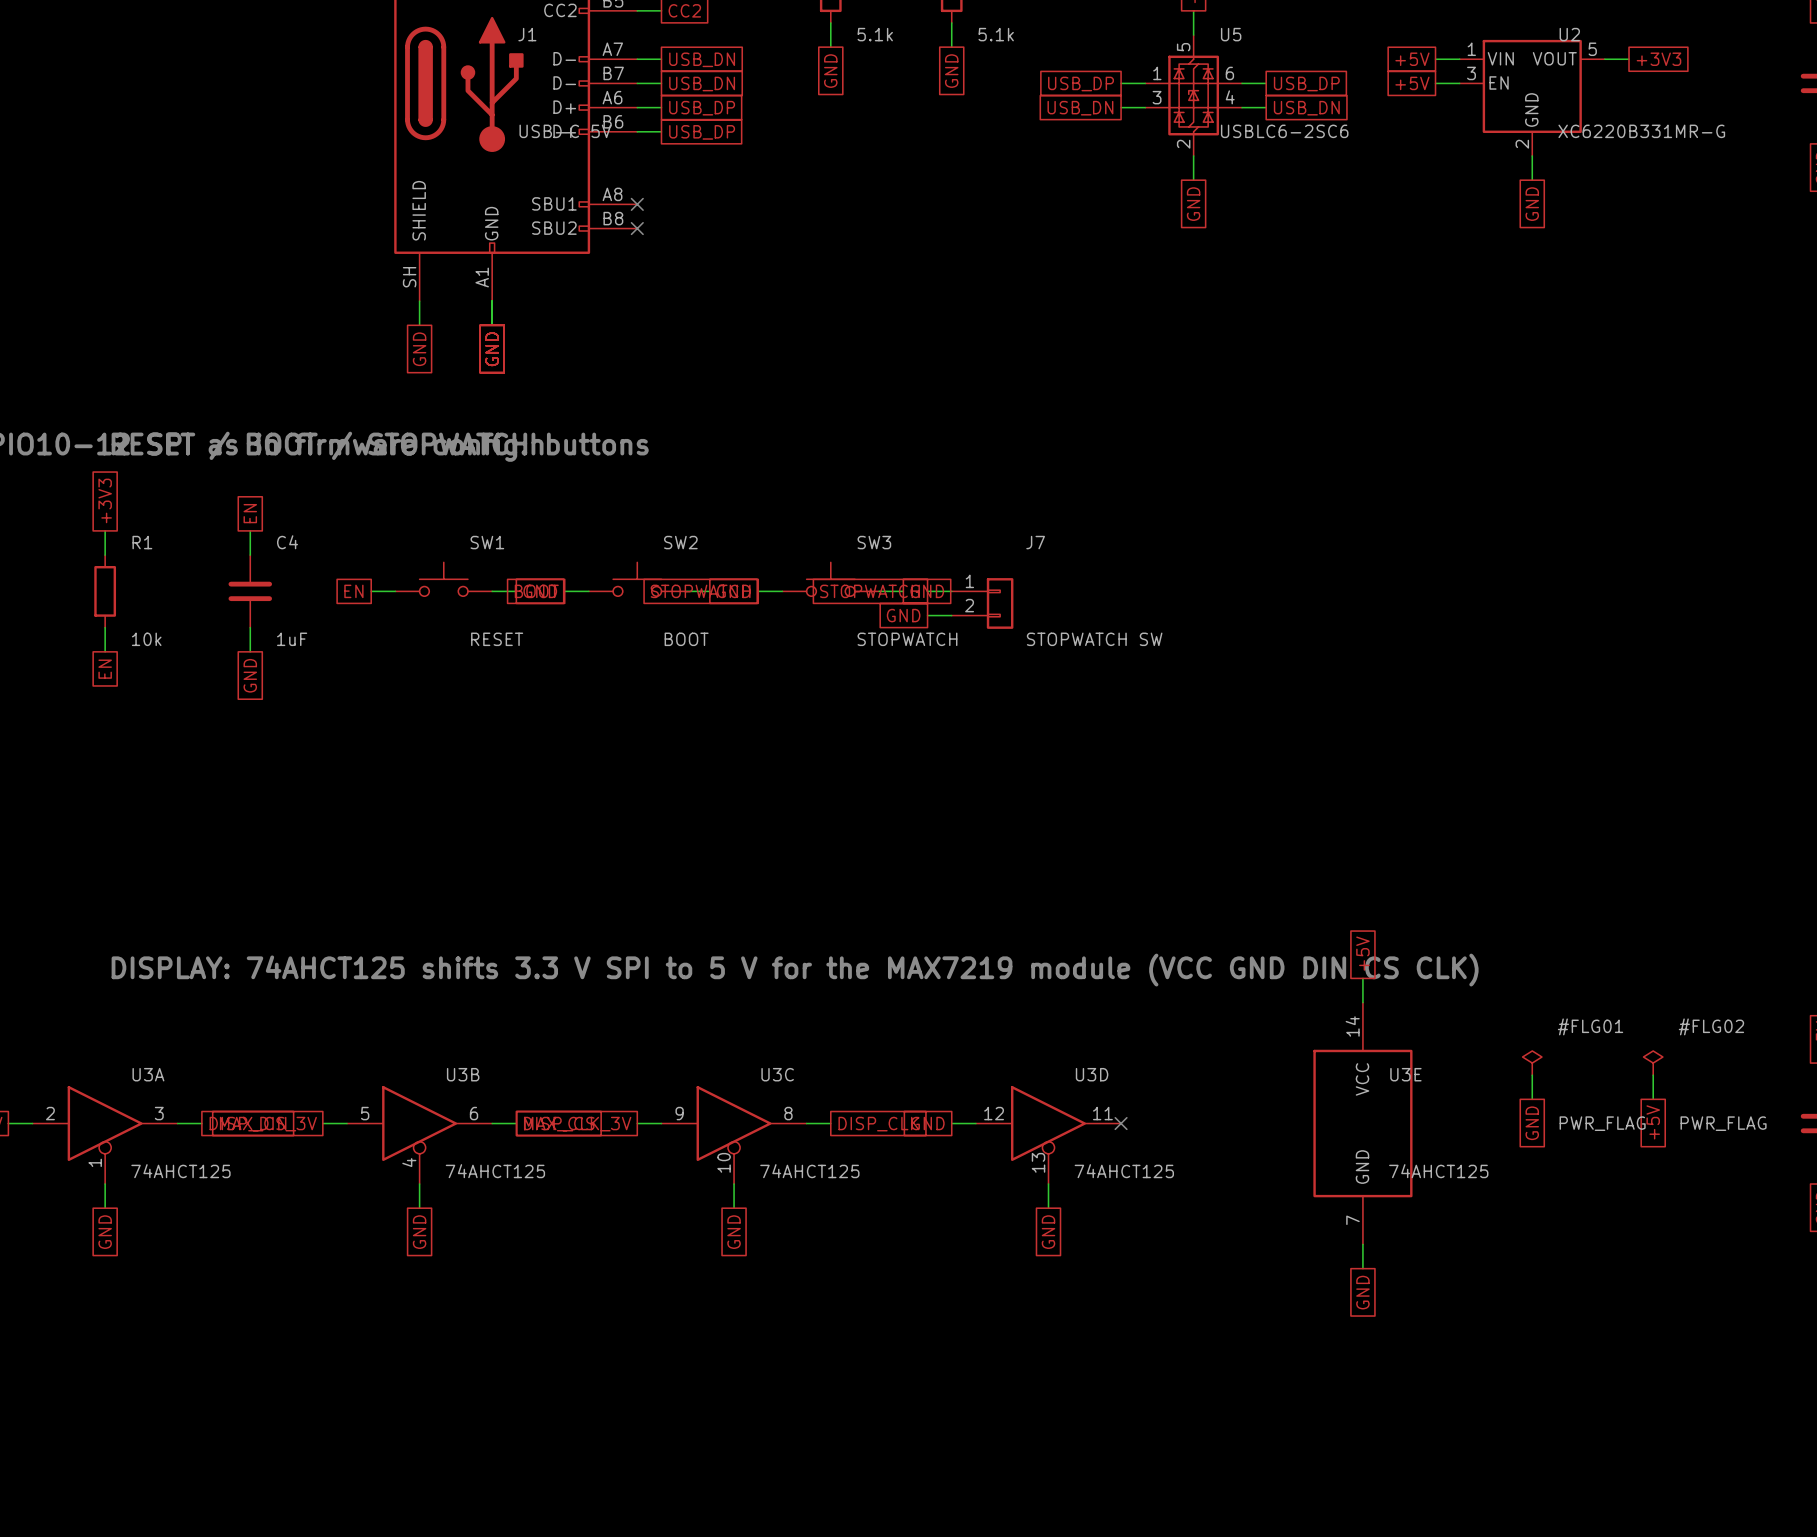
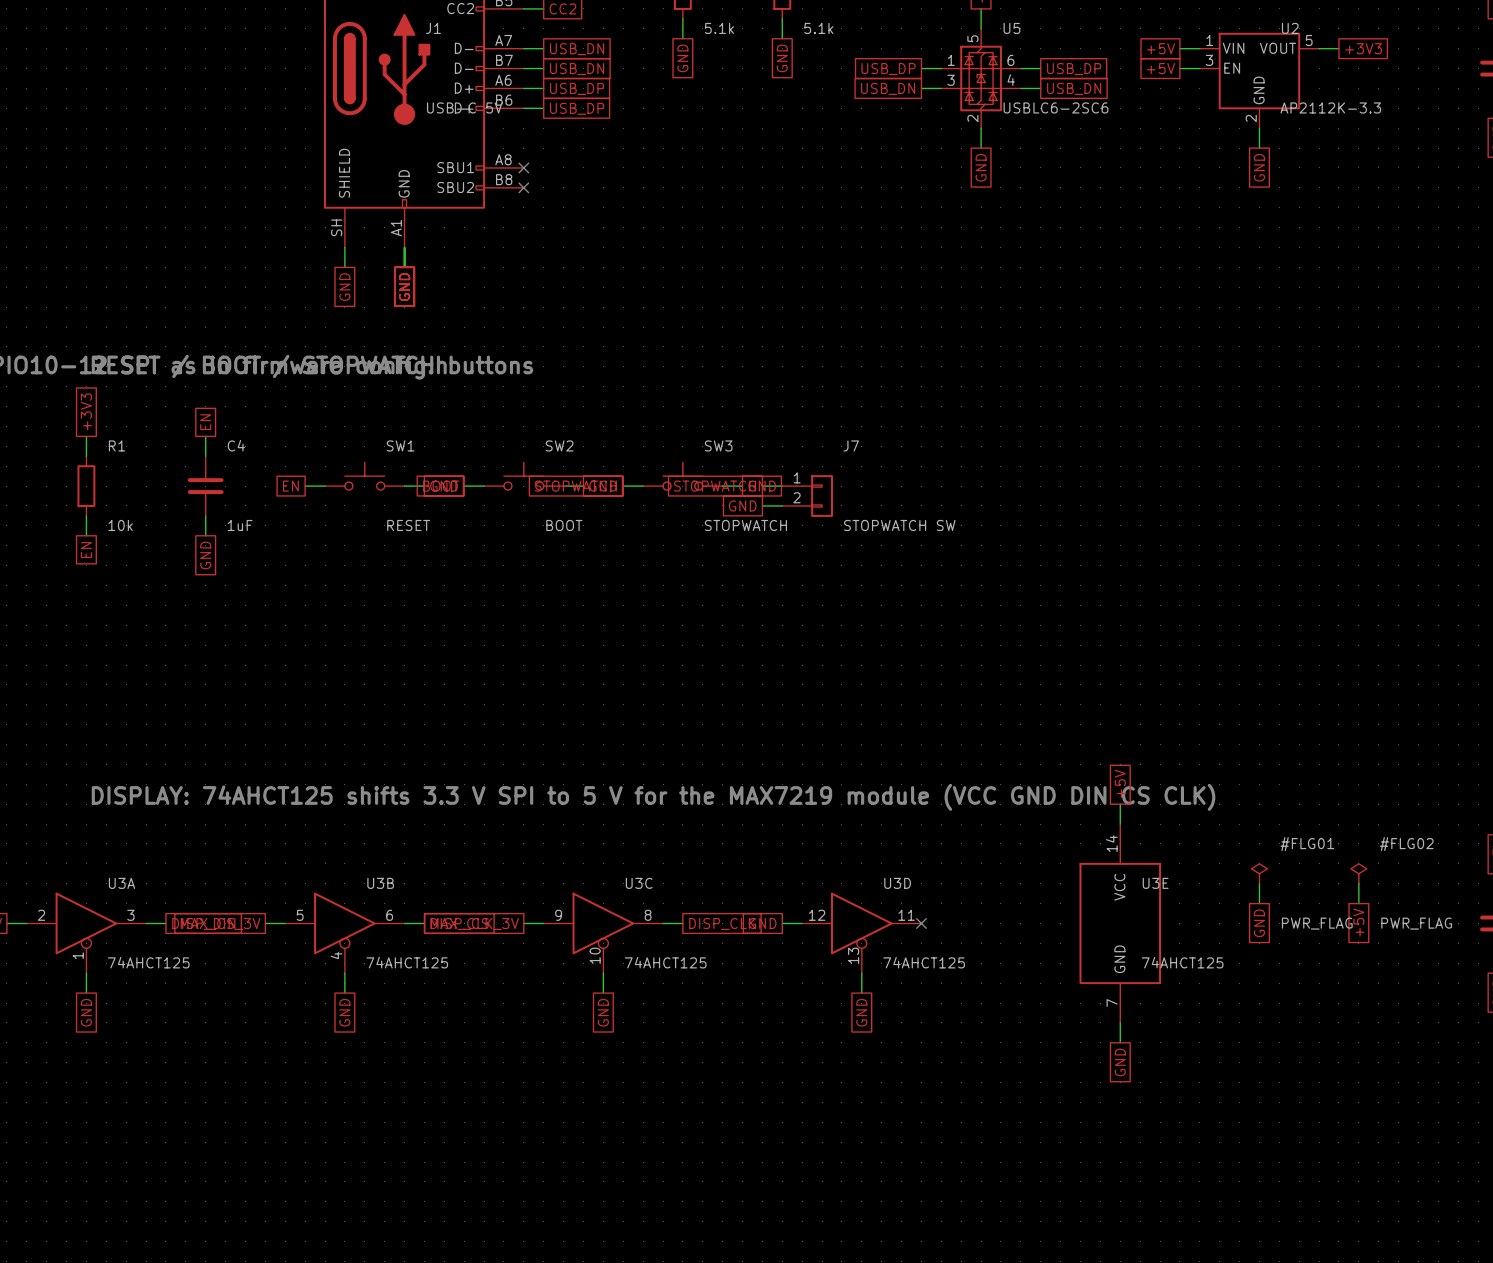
U2 value: XC6220B331MR-G (1641, 131) -> AP2112K-3.3 (1330, 107)

